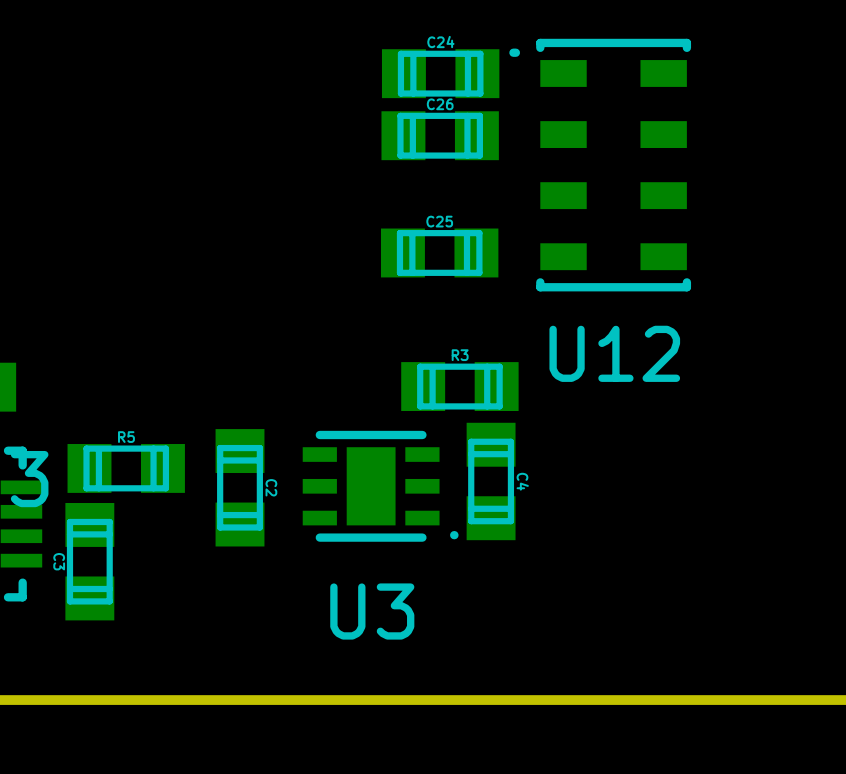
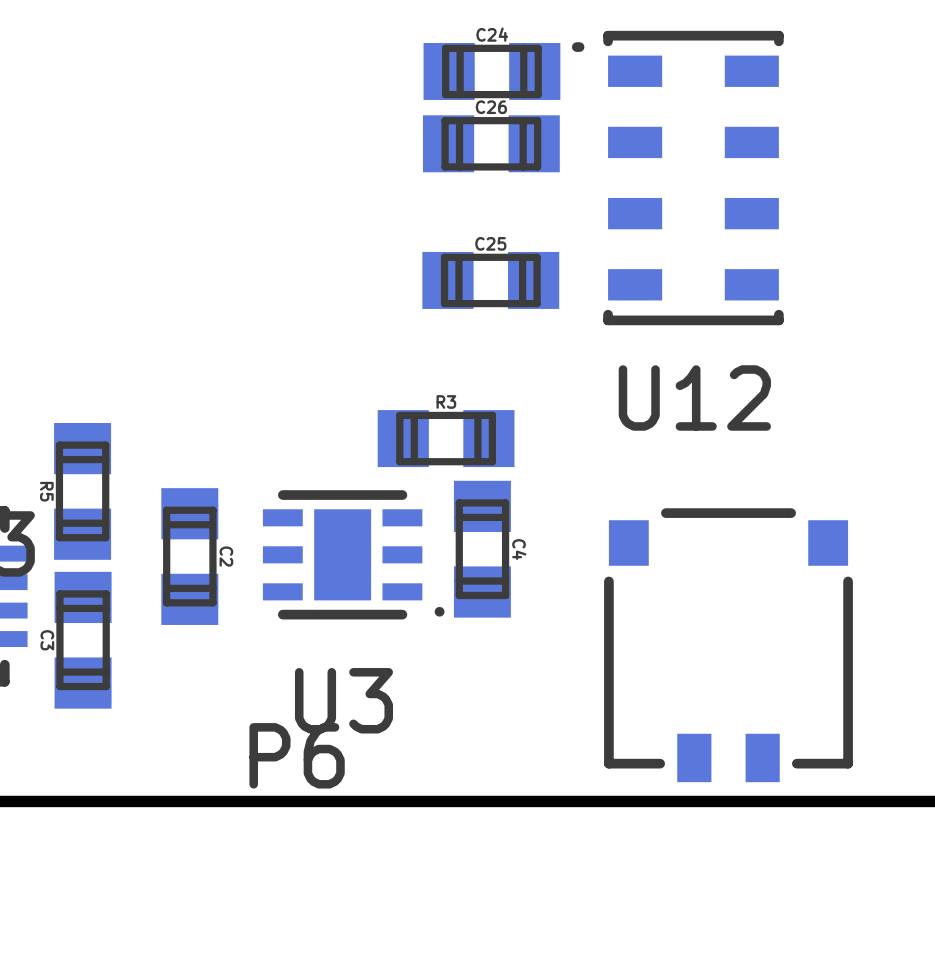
R3 position: (459, 386) -> (446, 438)
R5 rotation: 0° (126, 468) -> 90° counterclockwise (82, 491)
C4 position: (491, 481) -> (482, 549)
U3 position: (380, 486) -> (353, 554)
C2 position: (240, 487) -> (189, 556)
P6: none -> (728, 645)

